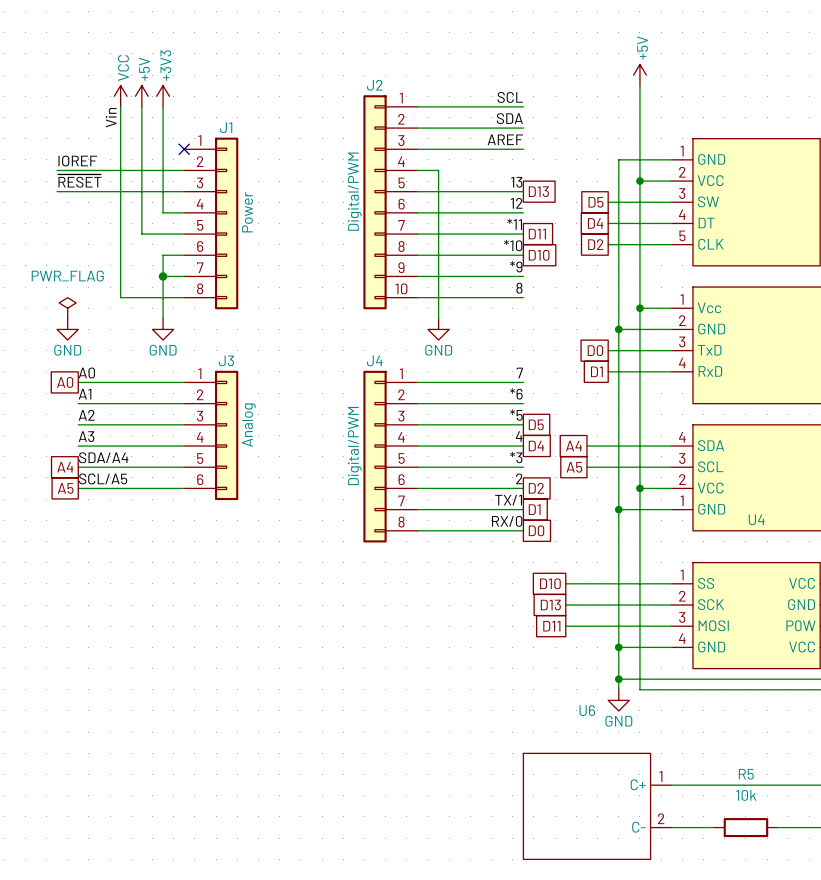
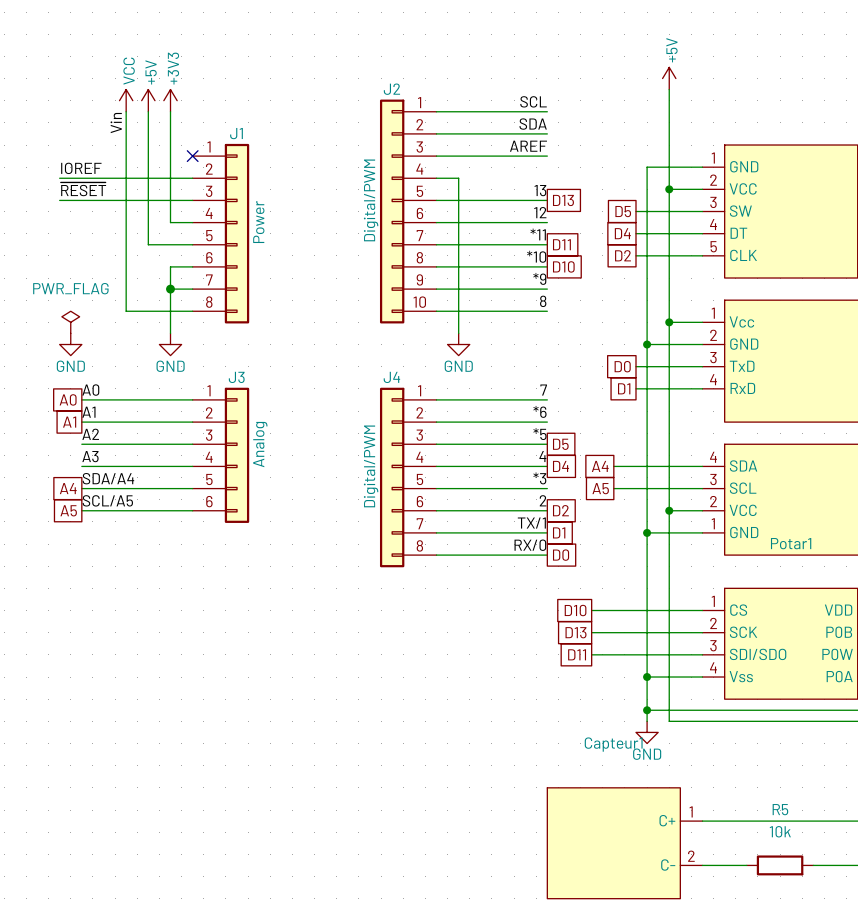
global label: none -> A1 (69, 422)
U4 name: U4 (756, 519) -> Potar1 (791, 543)
U4 pin name: SS (706, 583) -> CS (738, 610)
U4 pin name: VCC (802, 583) -> VDD (838, 610)
U4 pin name: GND (801, 604) -> P0B (839, 632)
U4 pin name: MOSI (713, 625) -> SDI/SDO (758, 654)
U4 pin name: GND (711, 647) -> Vss (741, 676)
U4 pin name: VCC (802, 647) -> P0A (839, 676)
U6: (597, 806) -> none
Capteur1: none -> (624, 843)

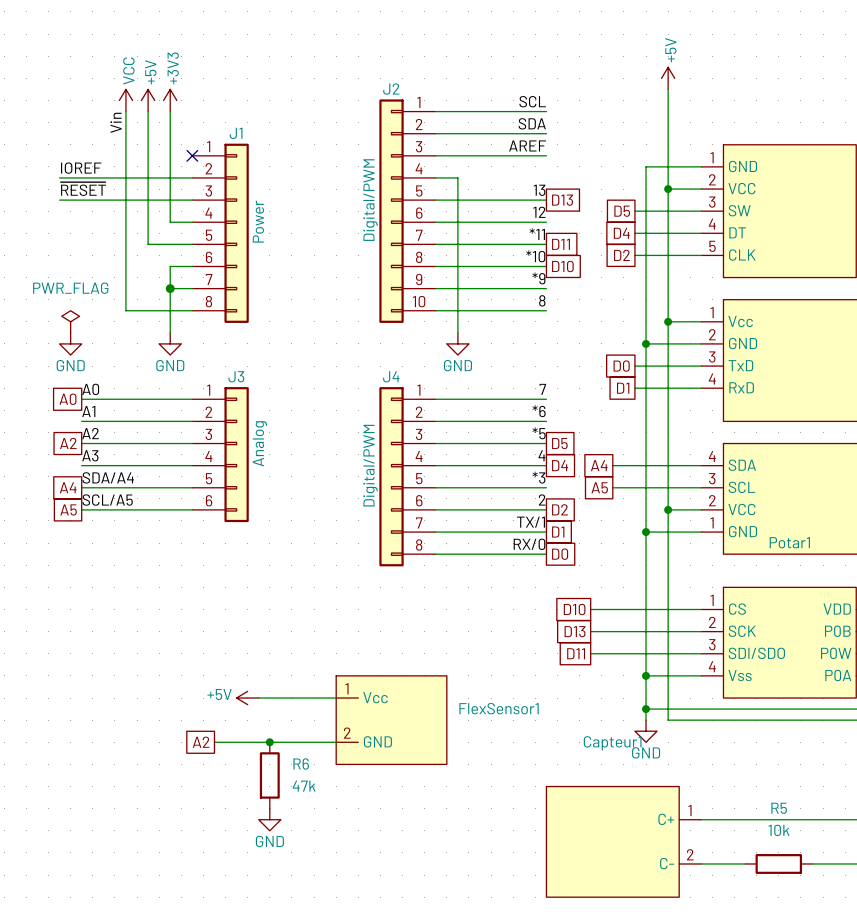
global label: A1 (69, 422) -> none
global label: none -> A2 (68, 443)
power symbol: none -> +5V (247, 698)
wire: none -> (258, 698) (336, 698)
FlexSensor1: none -> (391, 720)
global label: none -> A2 (201, 742)
wire: none -> (214, 742) (336, 742)
junction: none -> (269, 742)
R6: none -> 47k (269, 775)
power symbol: none -> GND (269, 819)

